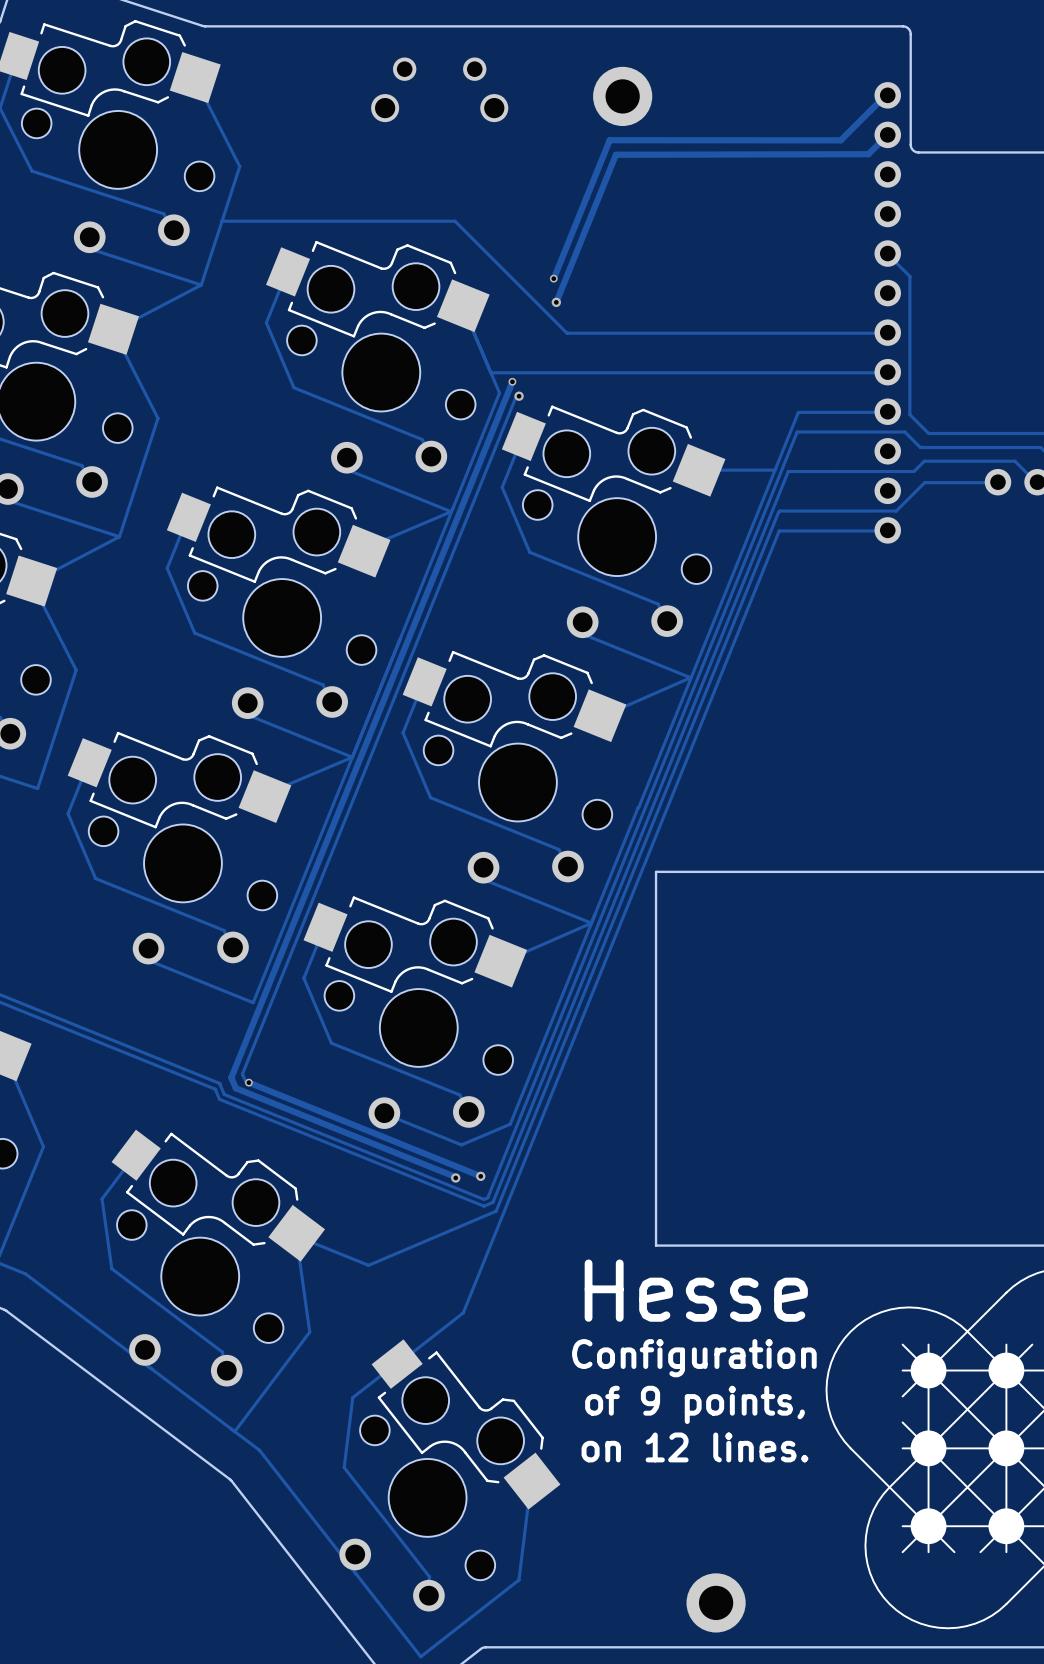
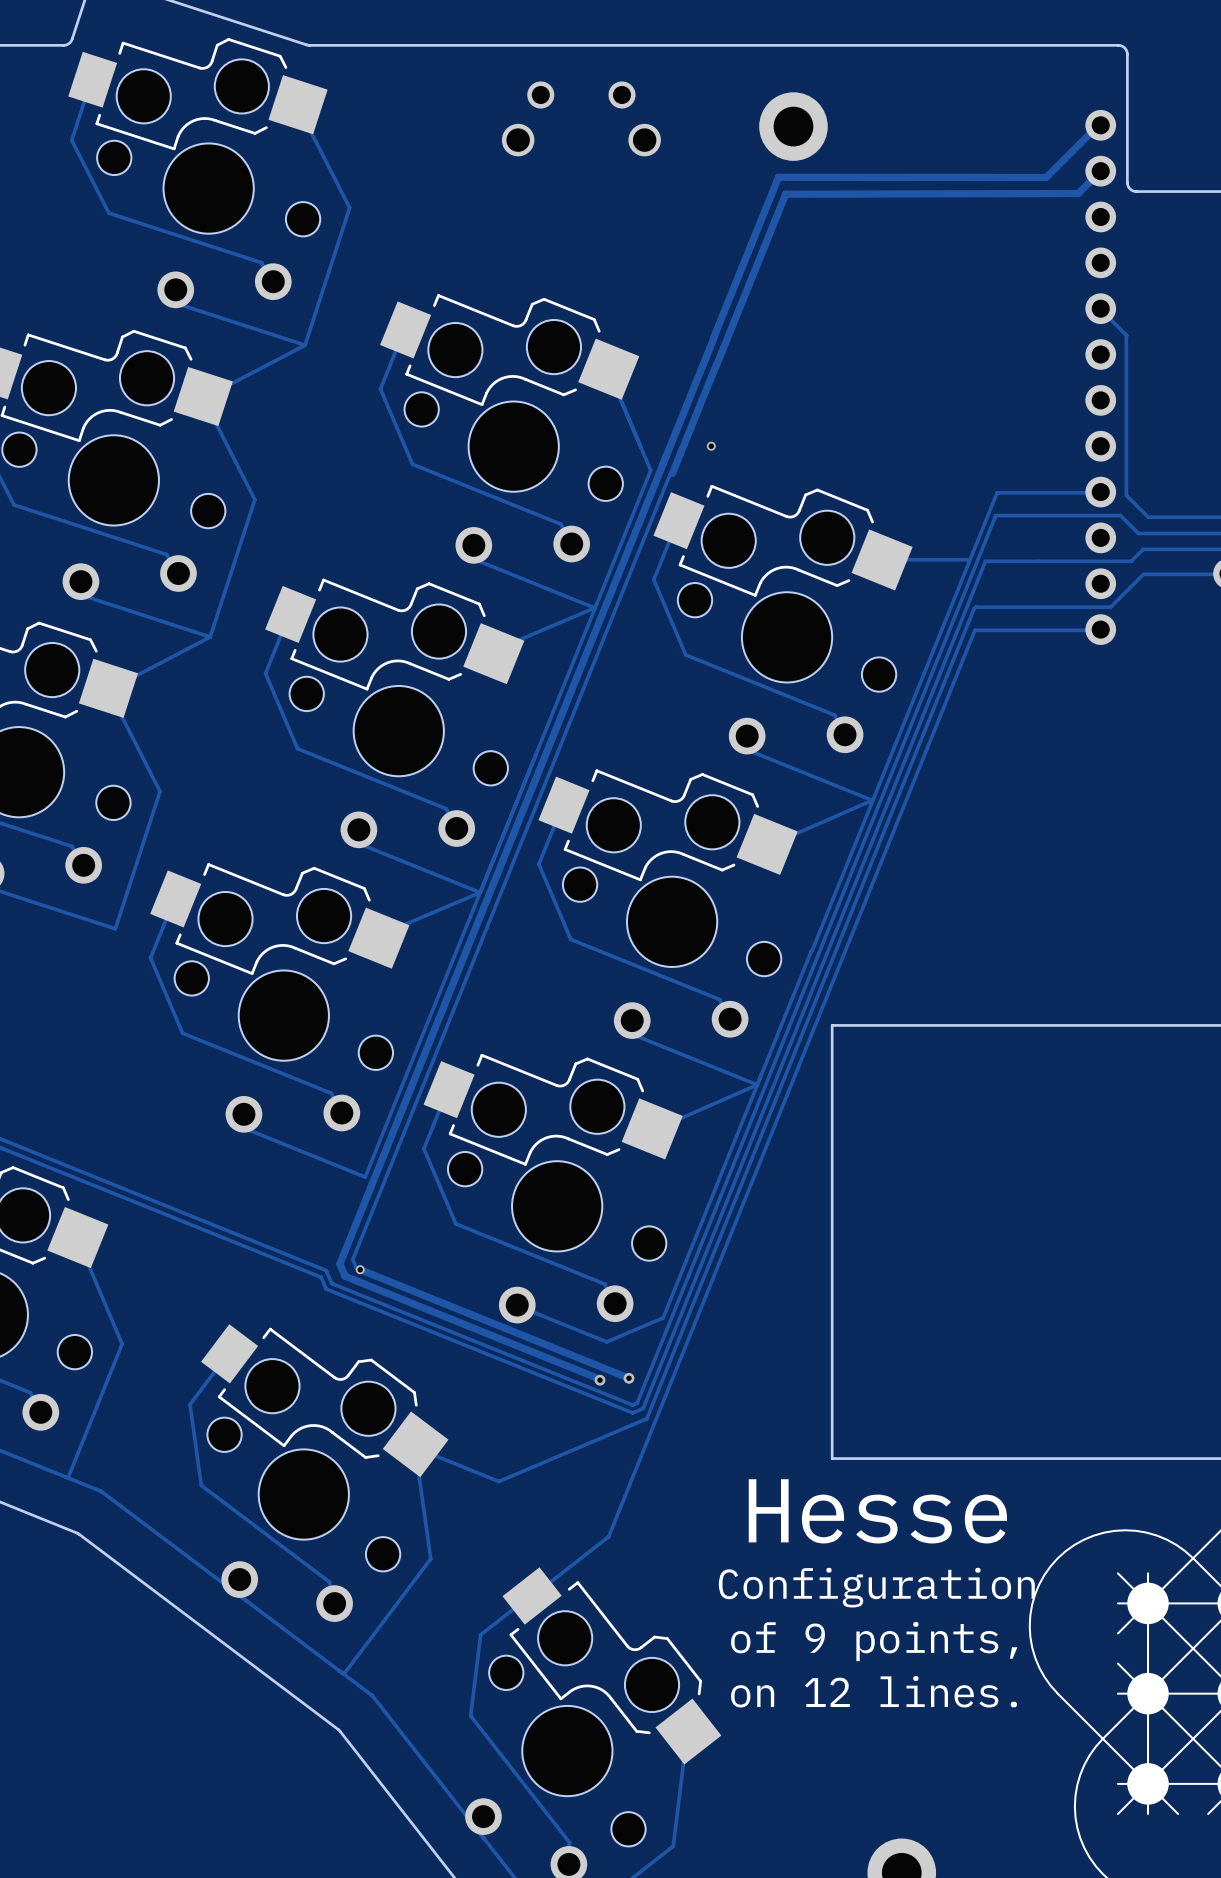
track: (222, 221) (454, 221) (568, 333) -> none
via: (553, 278) -> none
track: none -> (713, 338) (665, 457)
track: none -> (716, 365) (672, 473)
via: (556, 302) -> none
track: (887, 333) (568, 333) -> none
track: (887, 372) (490, 372) -> none
via position: (512, 381) -> (711, 446)
via: (519, 396) -> none

